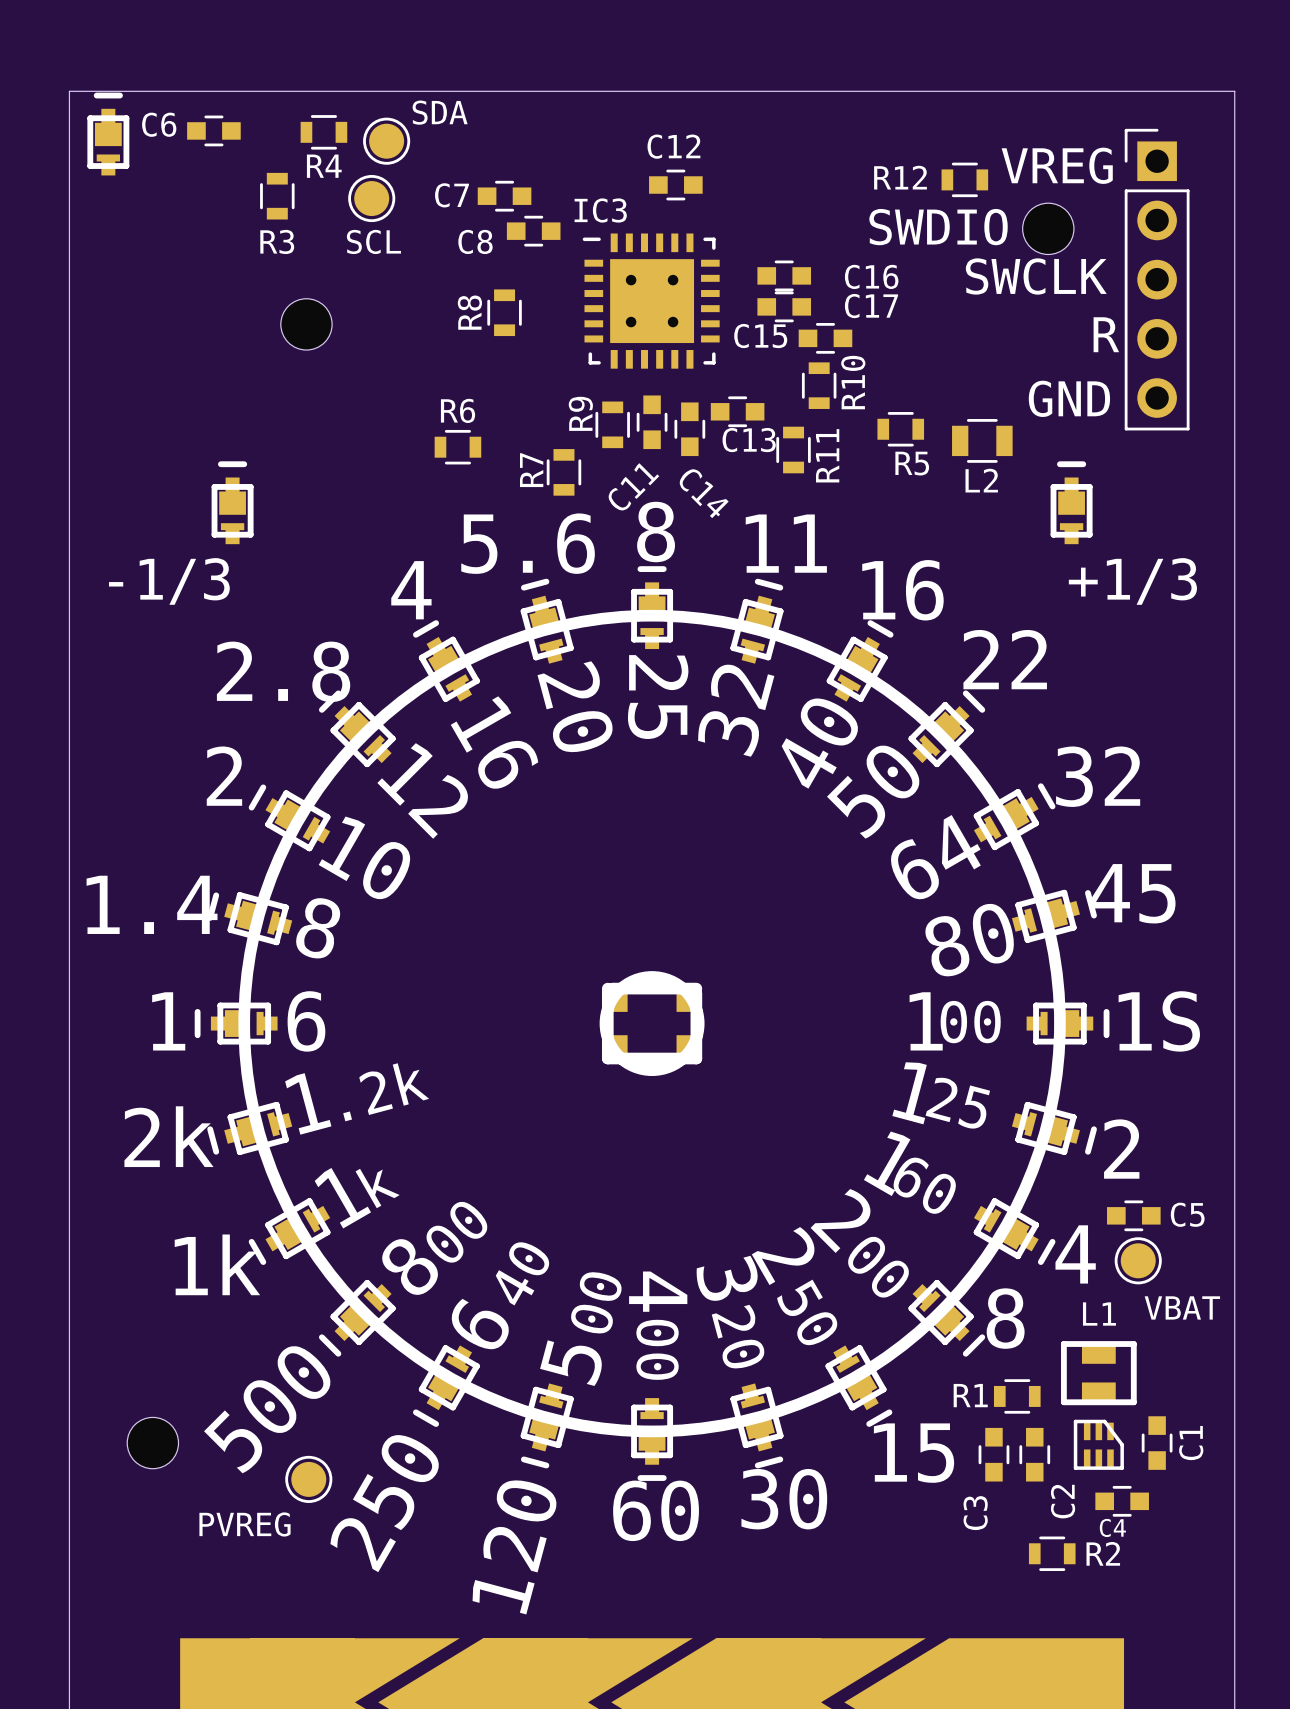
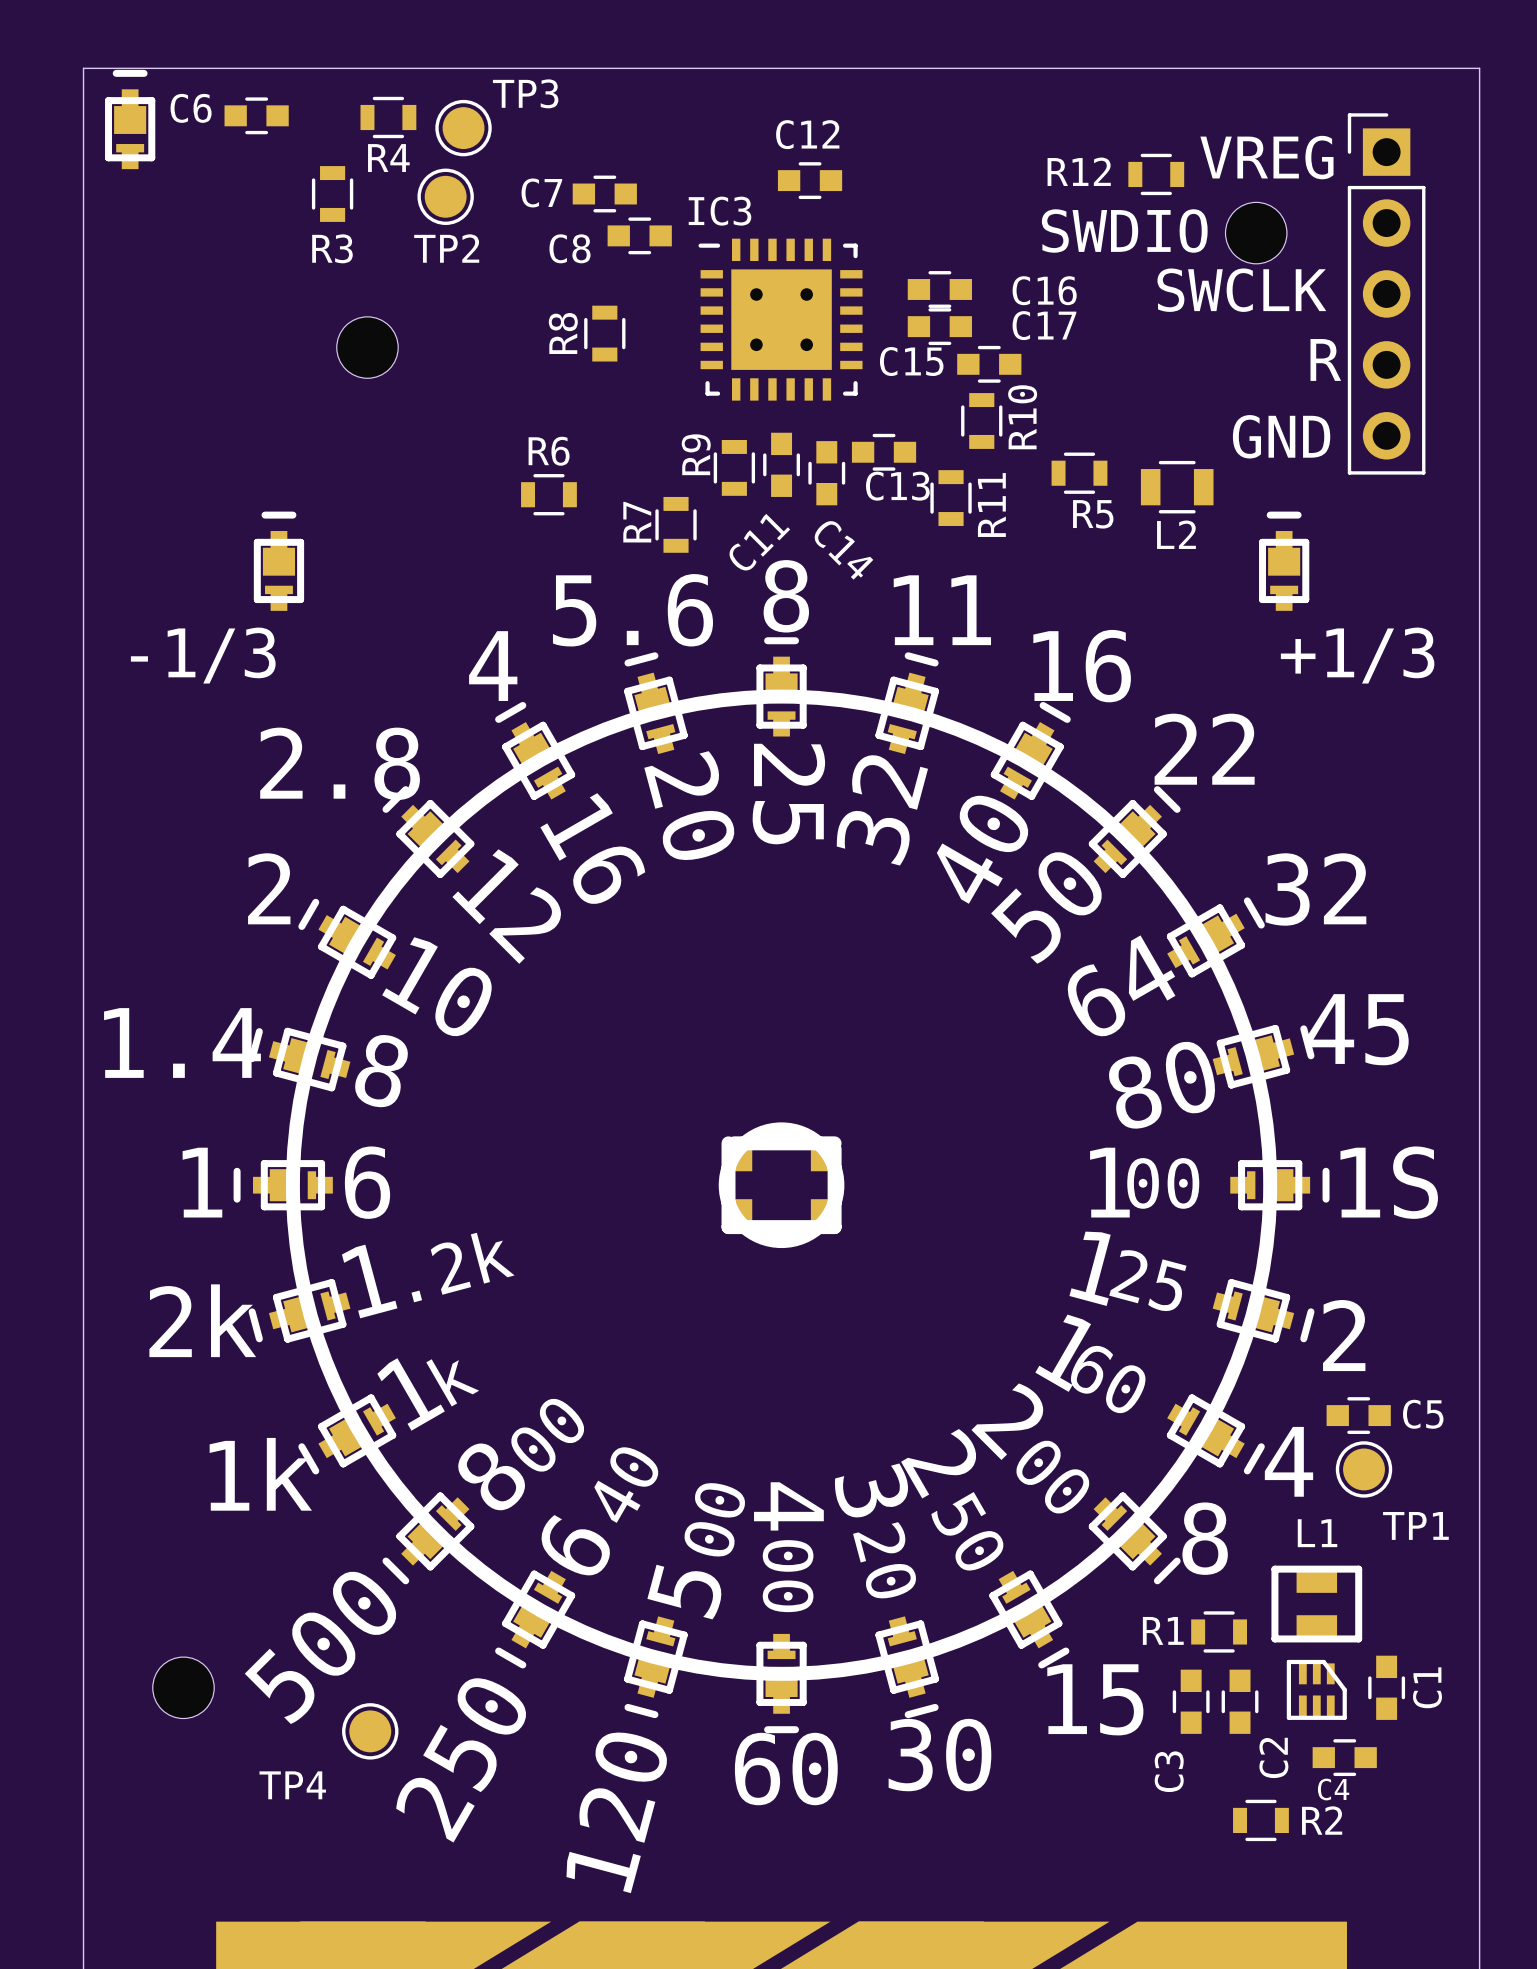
SDA name: SDA (440, 112) -> TP3 (525, 93)
SCL name: SCL (373, 241) -> TP2 (446, 248)
VBAT name: VBAT (1182, 1307) -> TP1 (1415, 1525)
PVREG name: PVREG (244, 1524) -> TP4 (292, 1785)

